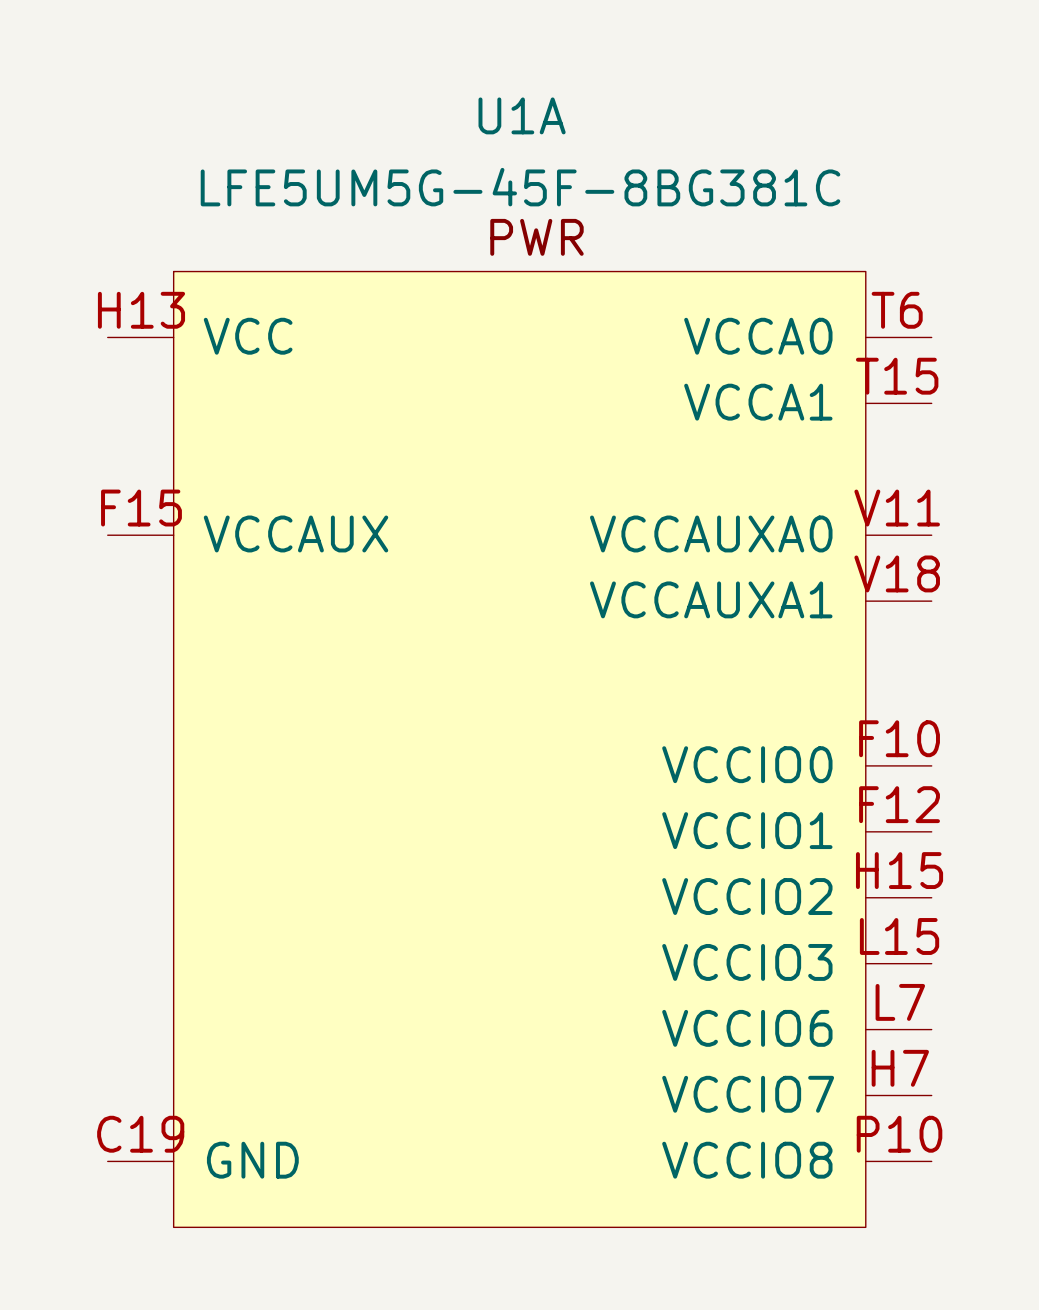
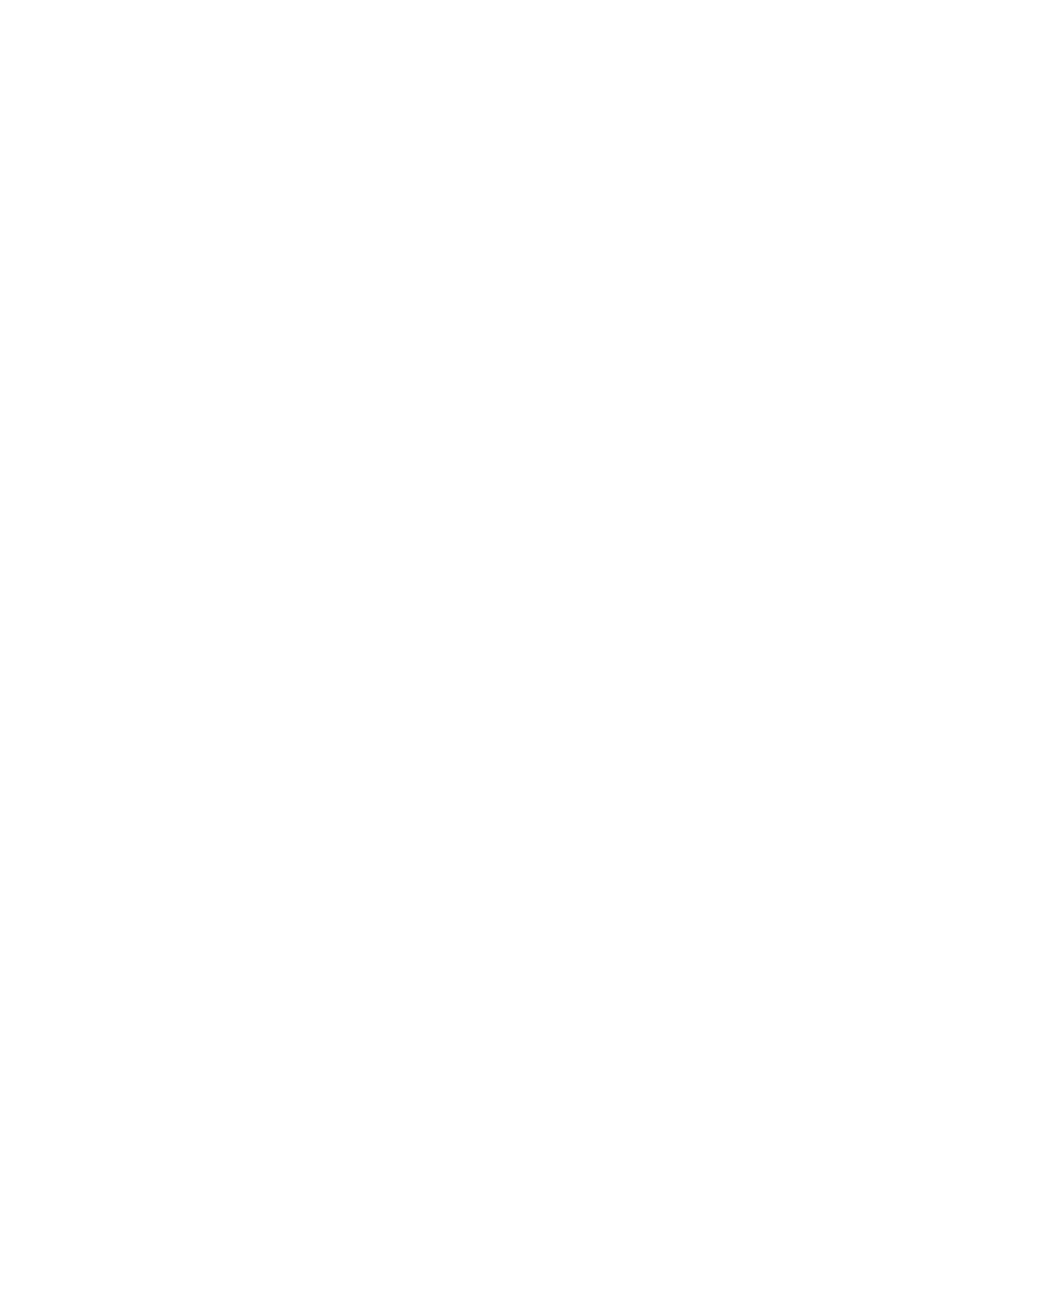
U1A: LFE5UM5G-45F-8BG381C (519, 749) -> none

